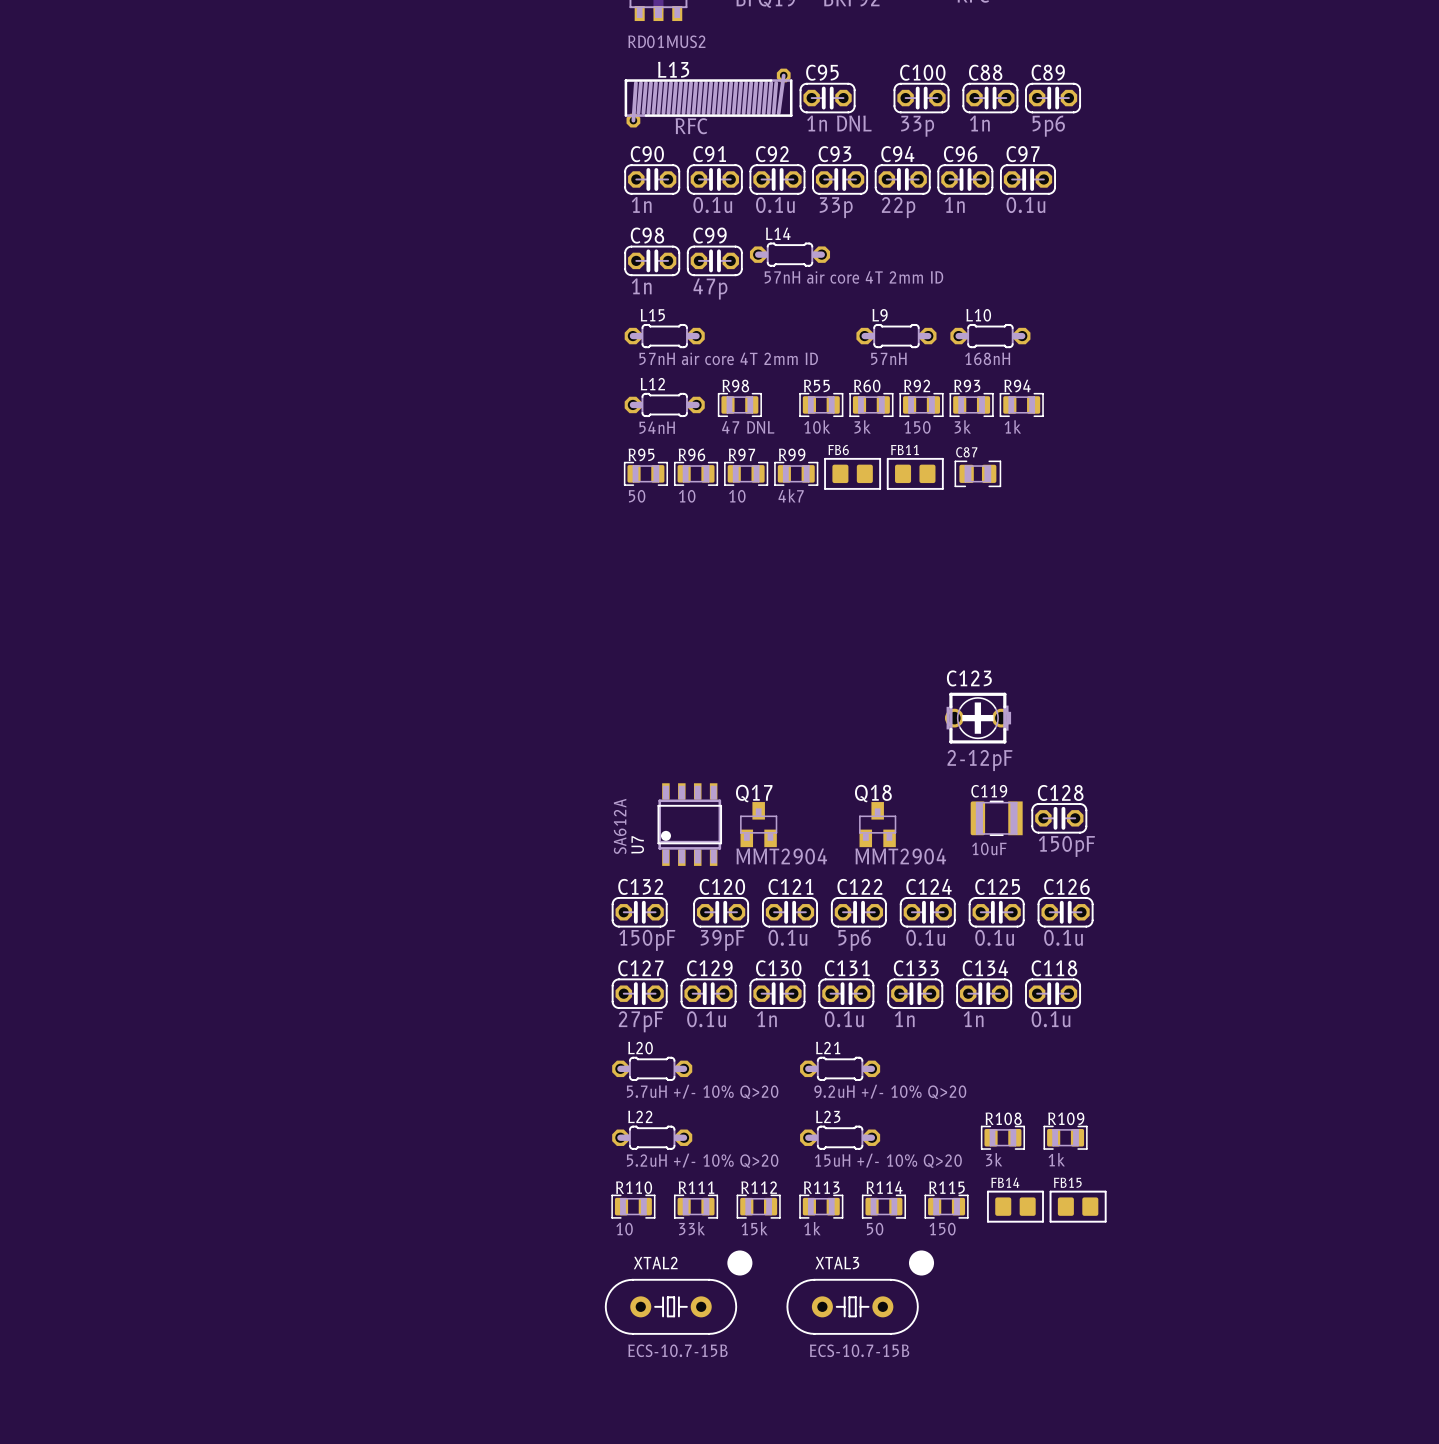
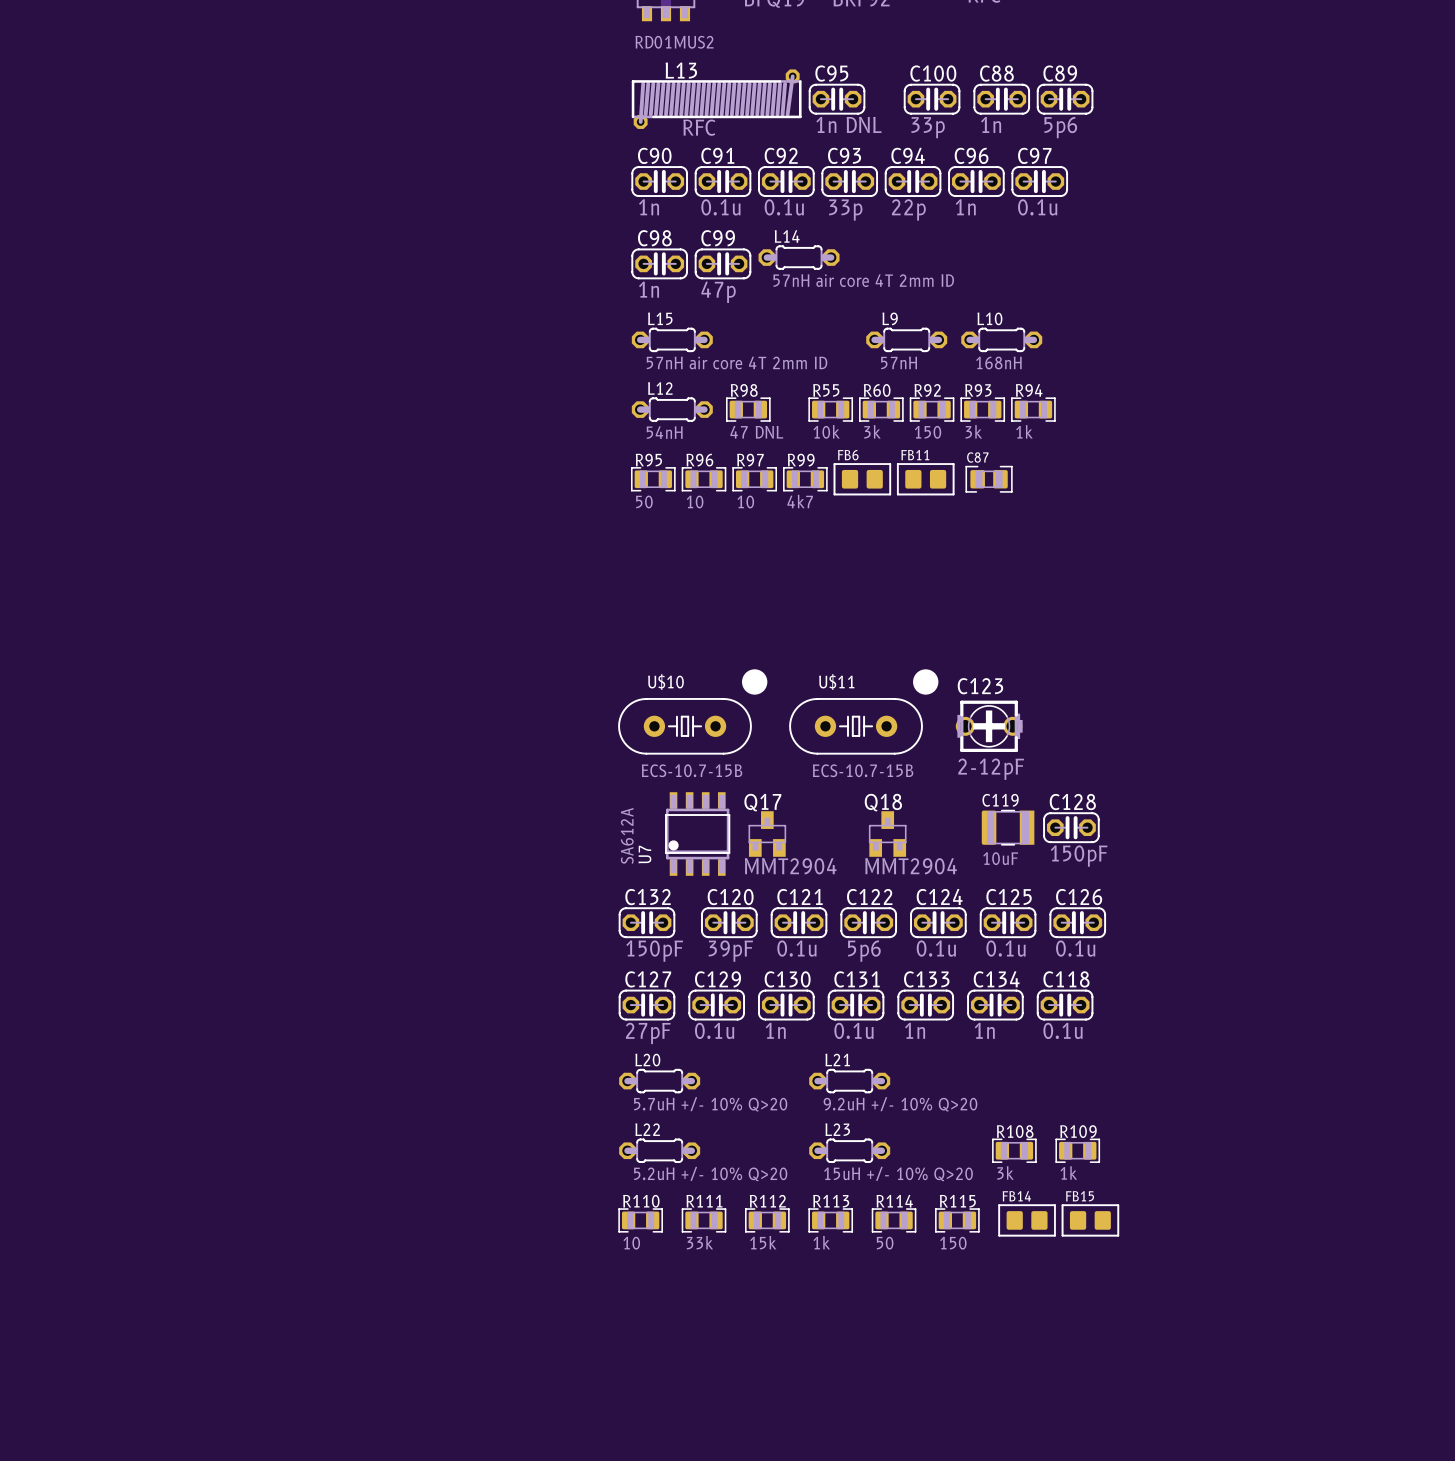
U$10: none -> ECS-10.7-15B (692, 711)
U$11: none -> ECS-10.7-15B (863, 711)
XTAL2: ECS-10.7-15B (678, 1292) -> none
XTAL3: ECS-10.7-15B (860, 1292) -> none

